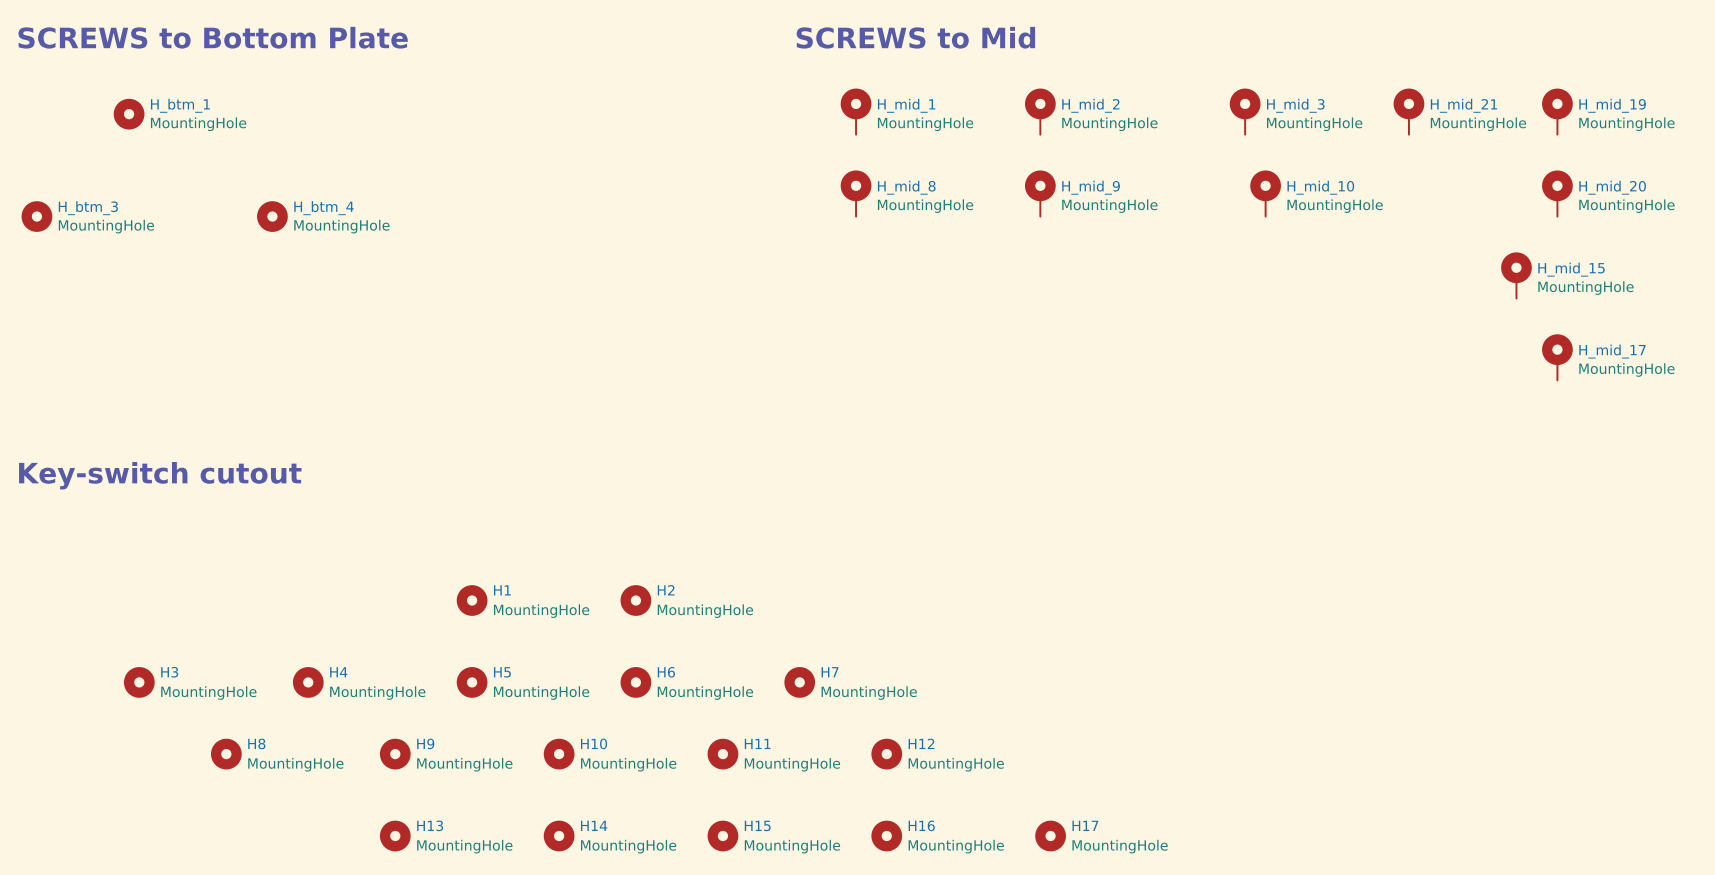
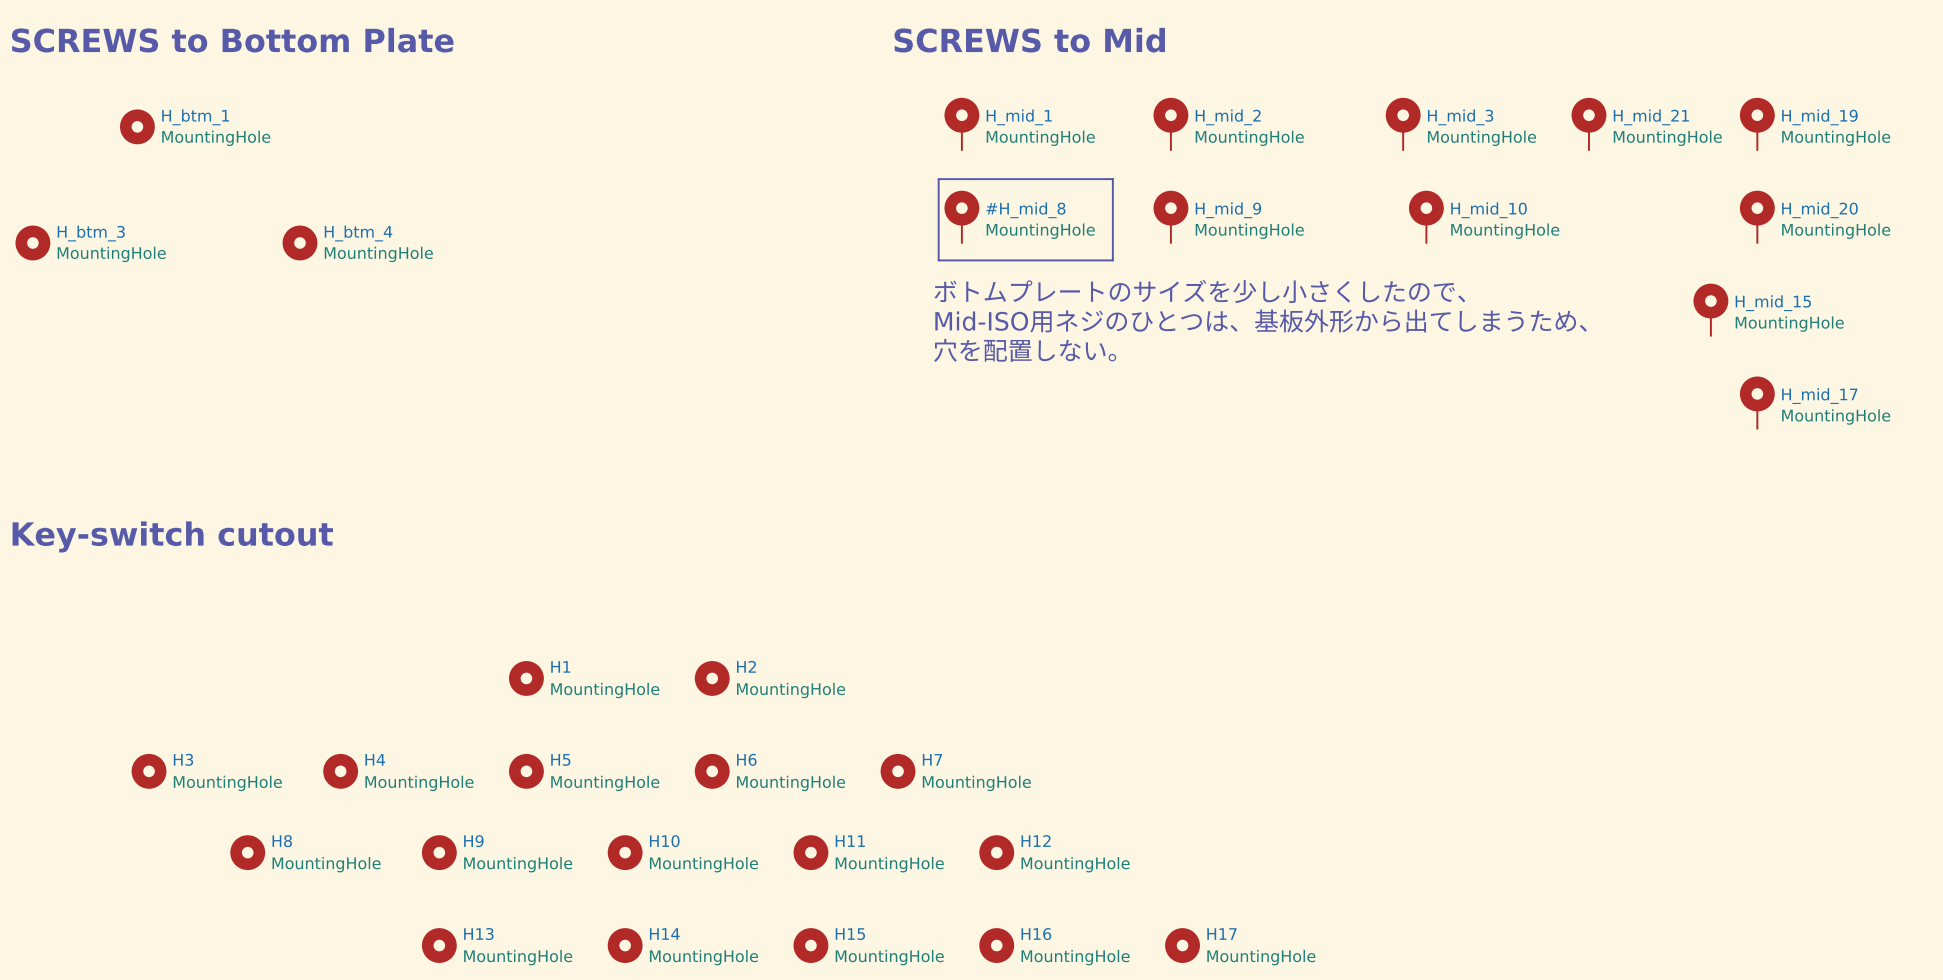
line: none -> (938, 179) (1112, 179) (1112, 260) (938, 260) (938, 179)
H_mid_8: MountingHole (856, 193) -> none
#H_mid_8: none -> MountingHole (961, 216)
text: none -> ボトムプレートのサイズを少し小さくしたので、 (1199, 291)
text: none -> Mid-ISO用ネジのひとつは、基板外形から出てしまうため、 (1261, 321)
text: none -> 穴を配置しない。 (1025, 350)

